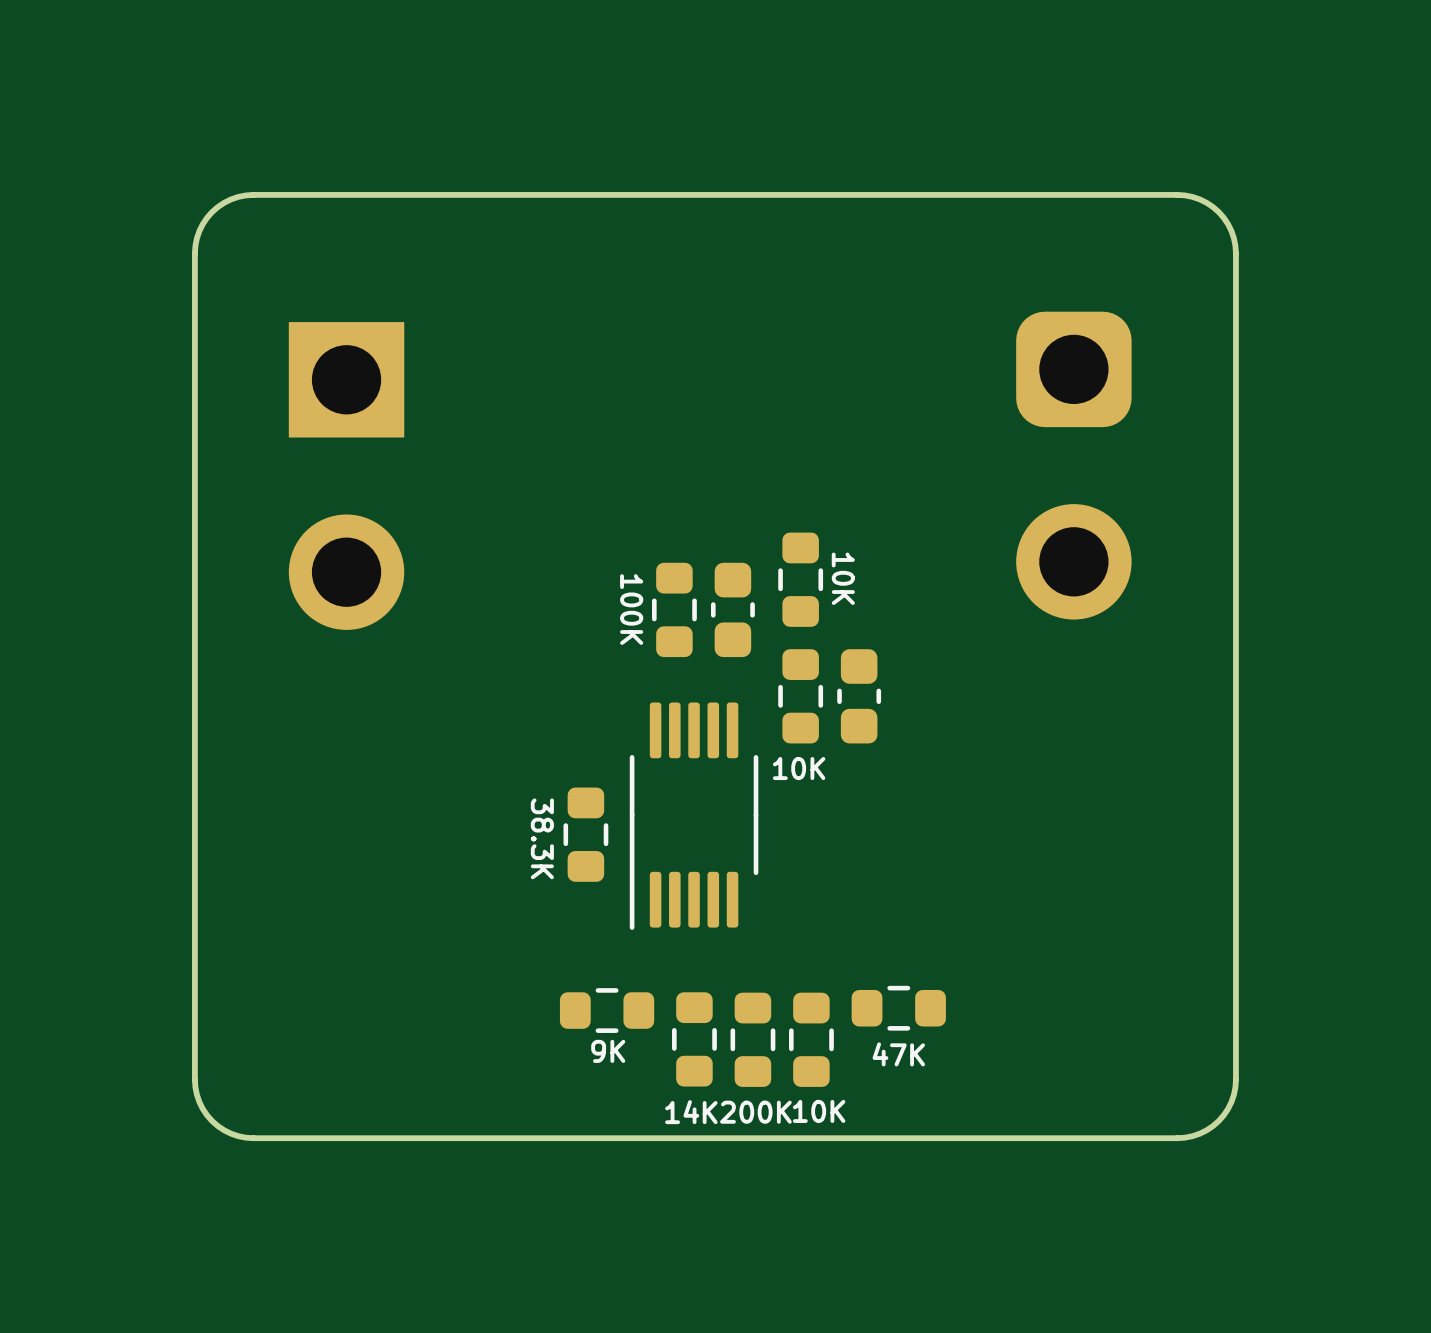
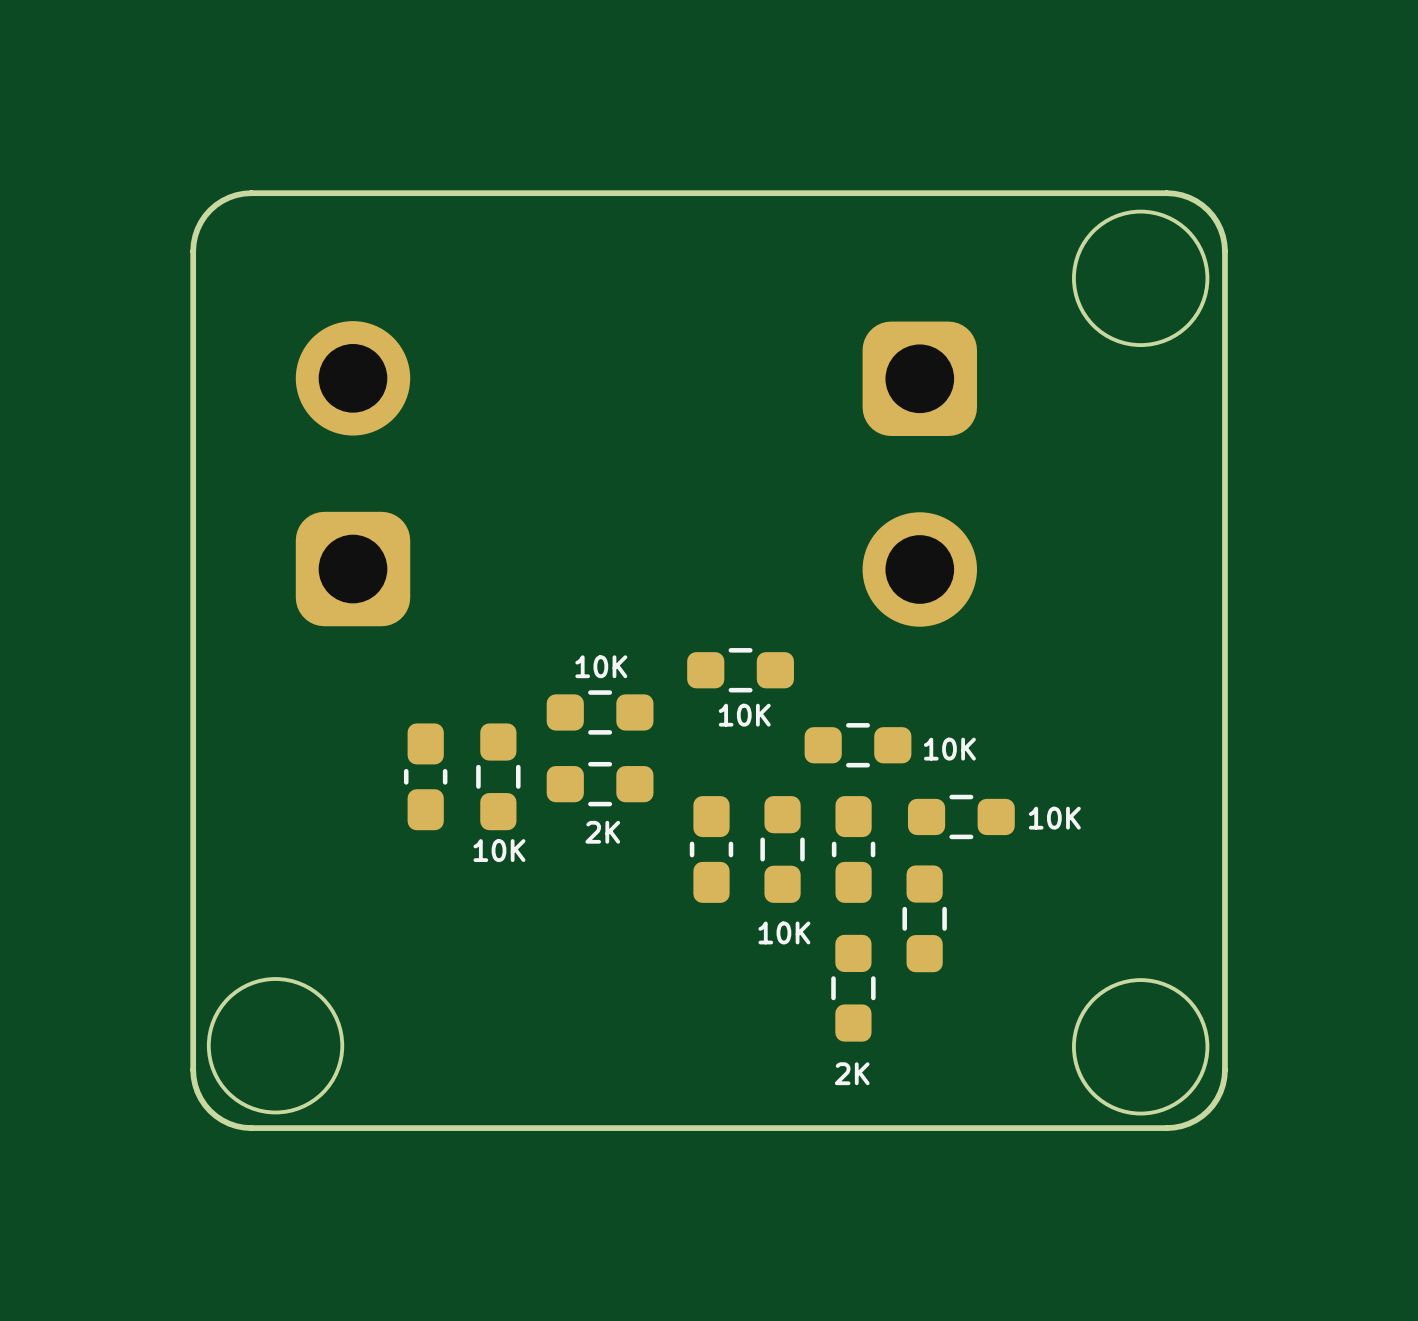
round board edge: none -> [1072, 209, 1210, 347]
part footprint: [288, 322, 405, 630] -> [295, 321, 411, 627]
part position: (1073, 465) -> (919, 474)
text: 10K (843, 578) -> none
part: (800, 579) -> none
text: 100K (631, 609) -> none
part: (674, 609) -> none
part: (732, 609) -> none
text: none -> 10K (601, 666)
part: none -> (740, 670)
part: (800, 696) -> none
part: (859, 696) -> none
part: none -> (600, 712)
part: none -> (858, 745)
text: none -> 10K (949, 749)
text position: 10K (799, 768) -> 10K (744, 715)
part: none -> (425, 776)
part: none -> (498, 776)
part: none -> (600, 784)
part: (694, 816) -> none
part: none -> (961, 816)
text: none -> 10K (1054, 818)
part: (585, 834) -> none
text: 38.3K (542, 838) -> none
text: none -> 2K (602, 832)
part: none -> (711, 849)
part: none -> (782, 849)
part: none -> (853, 849)
text: none -> 10K (499, 850)
part: none -> (924, 918)
text: none -> 10K (784, 932)
round board edge: none -> [206, 977, 345, 1115]
round board edge: none -> [1072, 978, 1210, 1116]
part: none -> (853, 988)
part: (898, 1008) -> none
part: (607, 1010) -> none
part: (694, 1039) -> none
part: (752, 1039) -> none
part: (811, 1039) -> none
text: 9K (608, 1051) -> none
text: 47K (898, 1054) -> none
text: none -> 2K (852, 1073)
text: 10K (819, 1111) -> none
text: 14K (691, 1112) -> none
text: 200K (755, 1112) -> none

